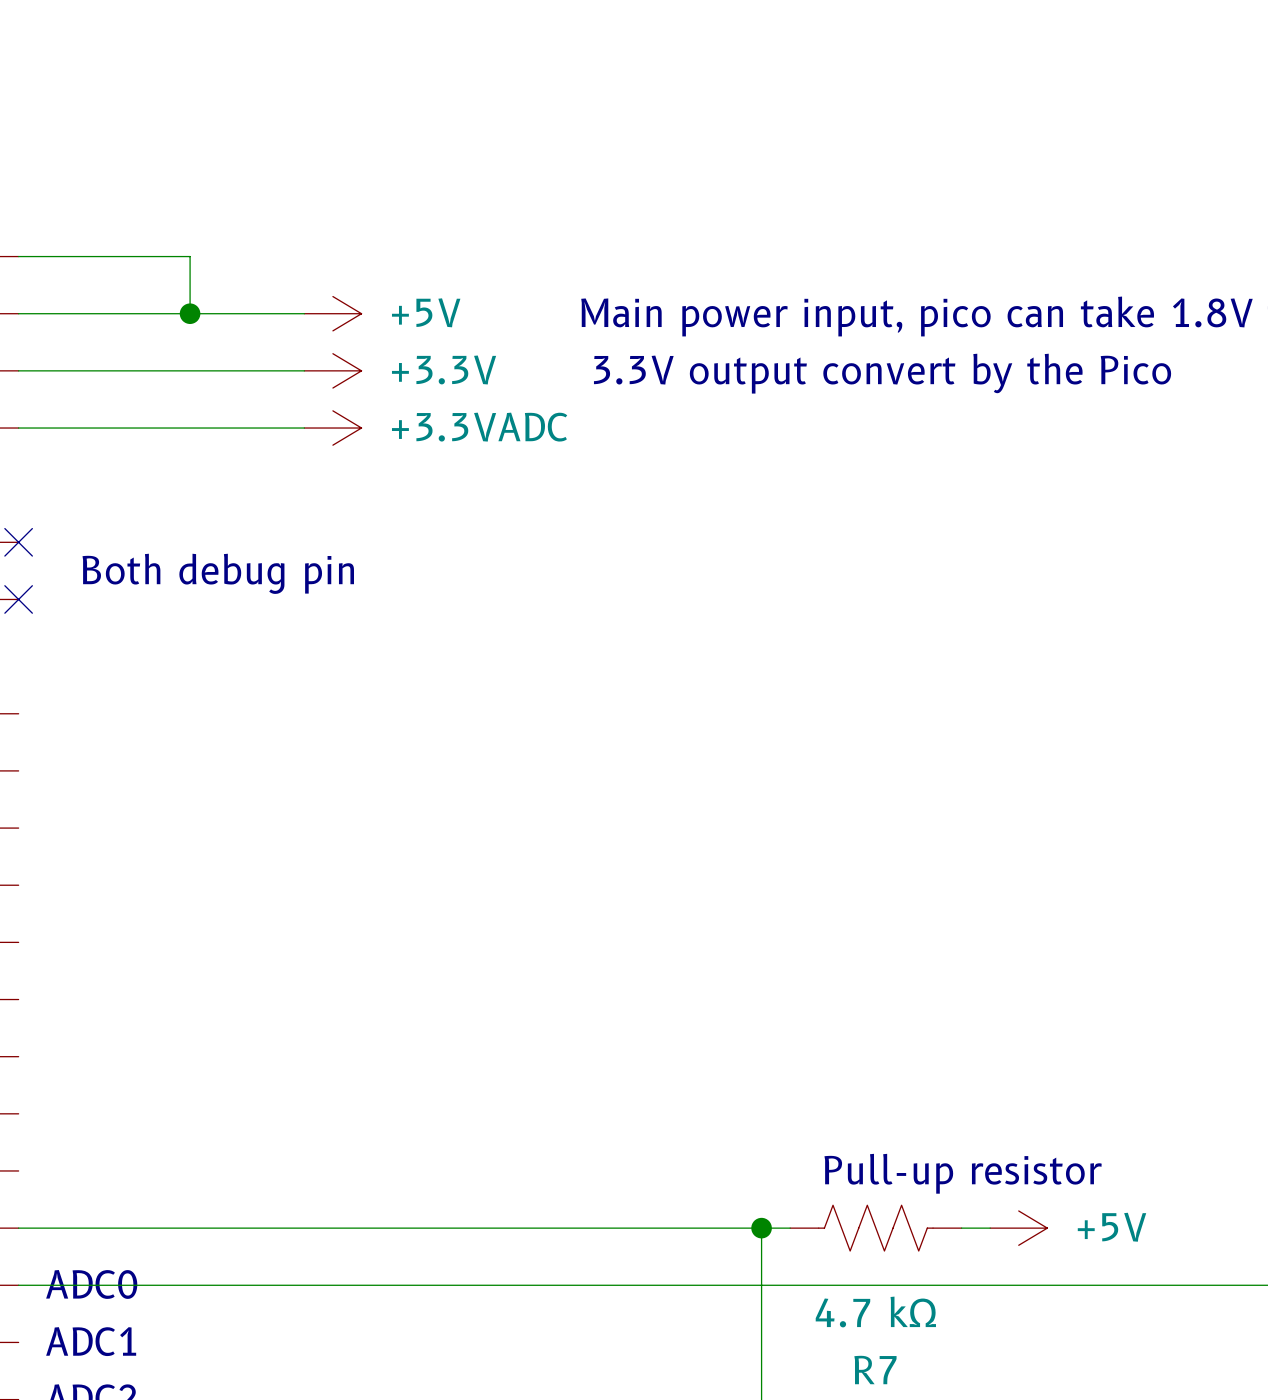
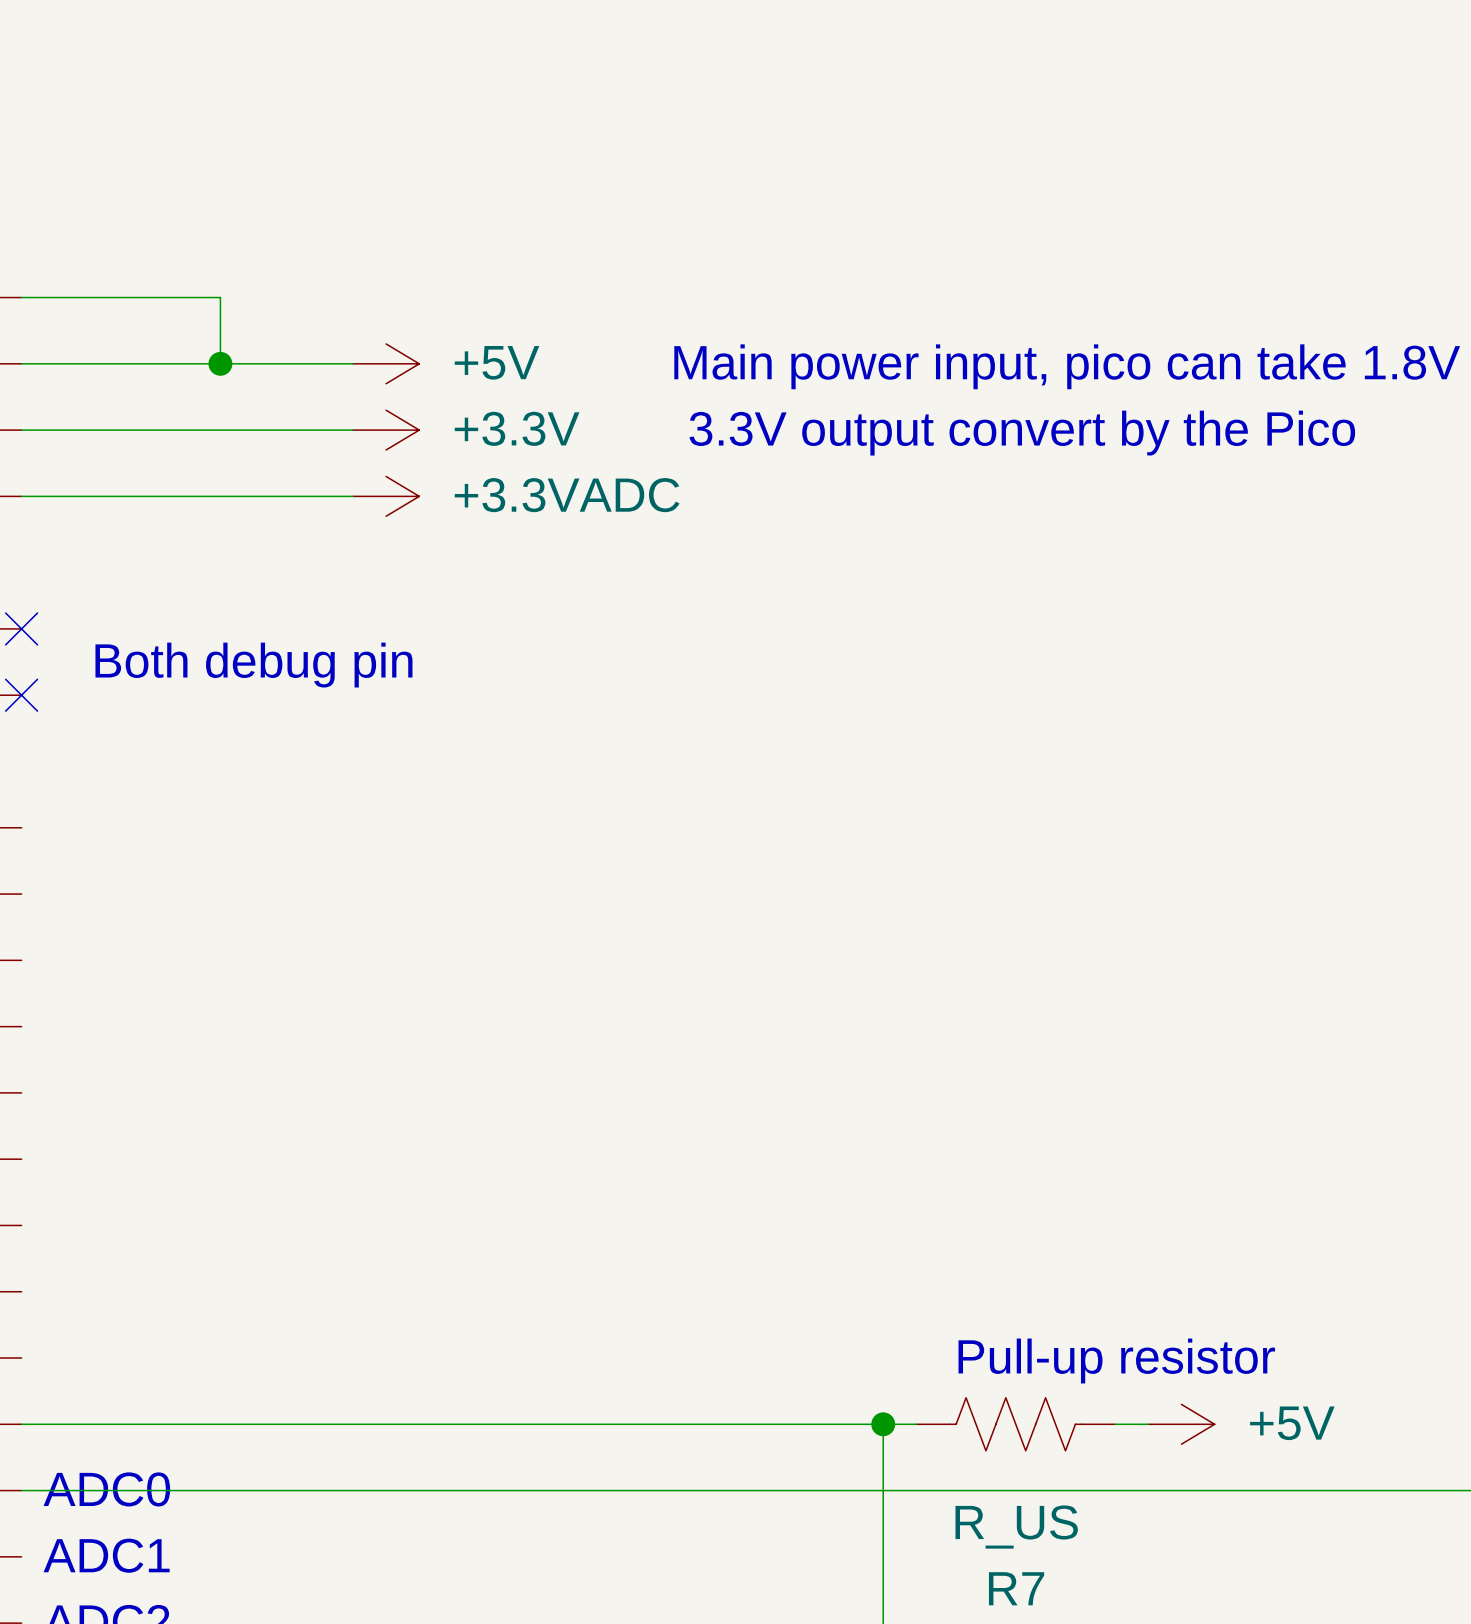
R7 value: 4.7 kΩ (875, 1312) -> R_US (1016, 1527)

